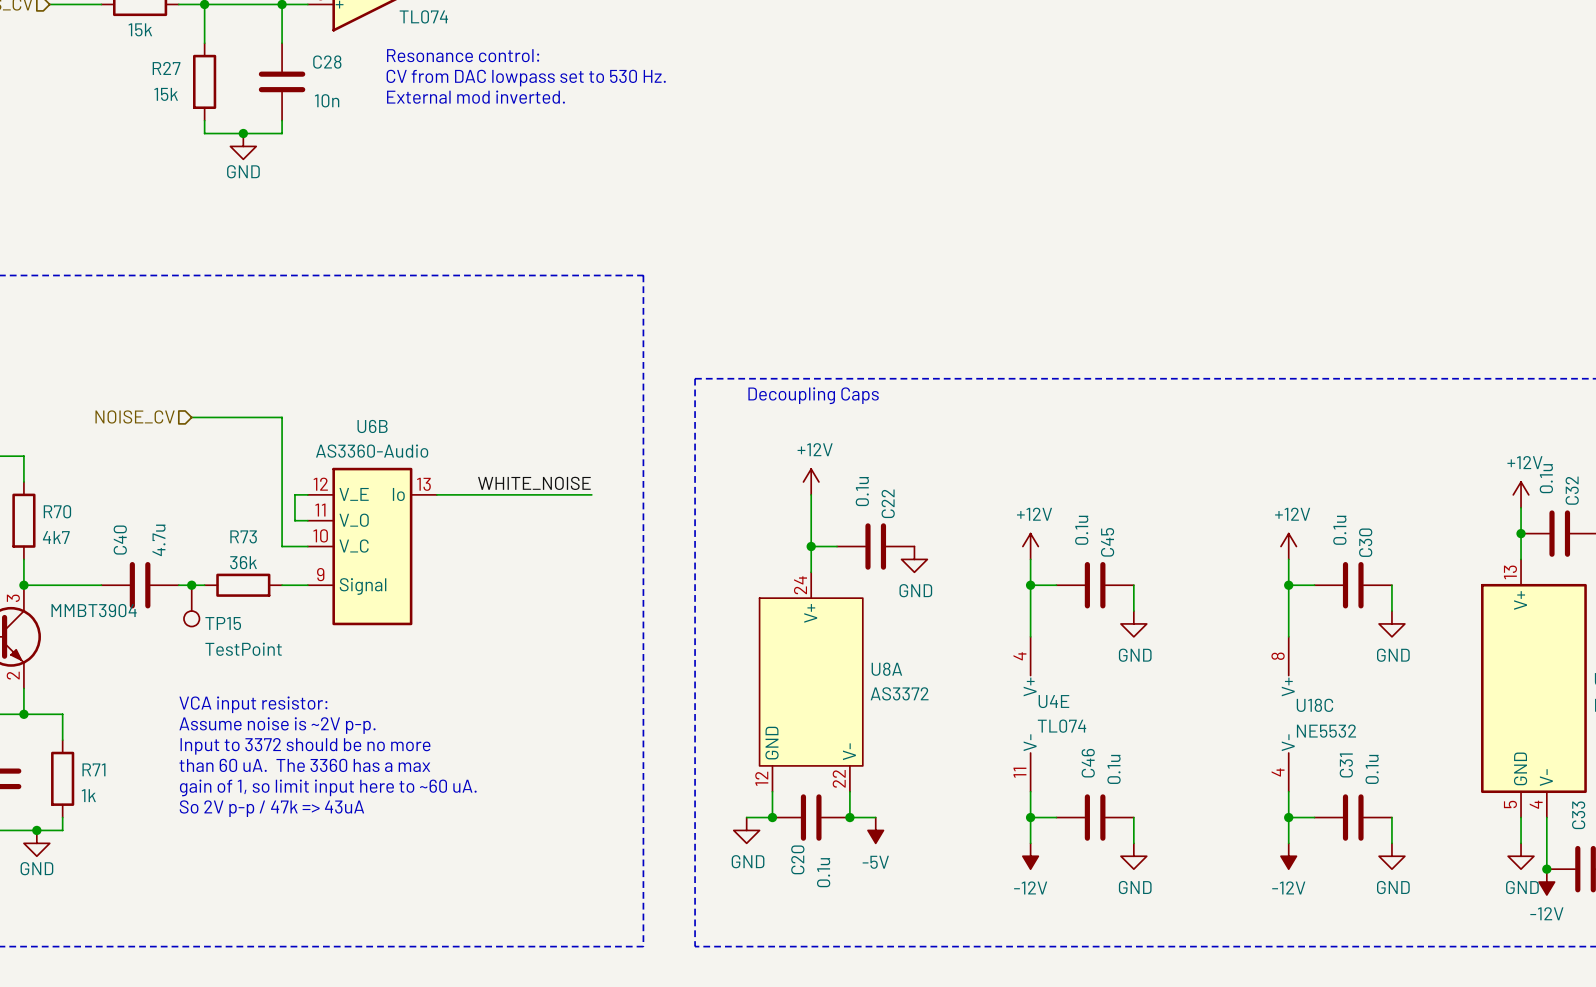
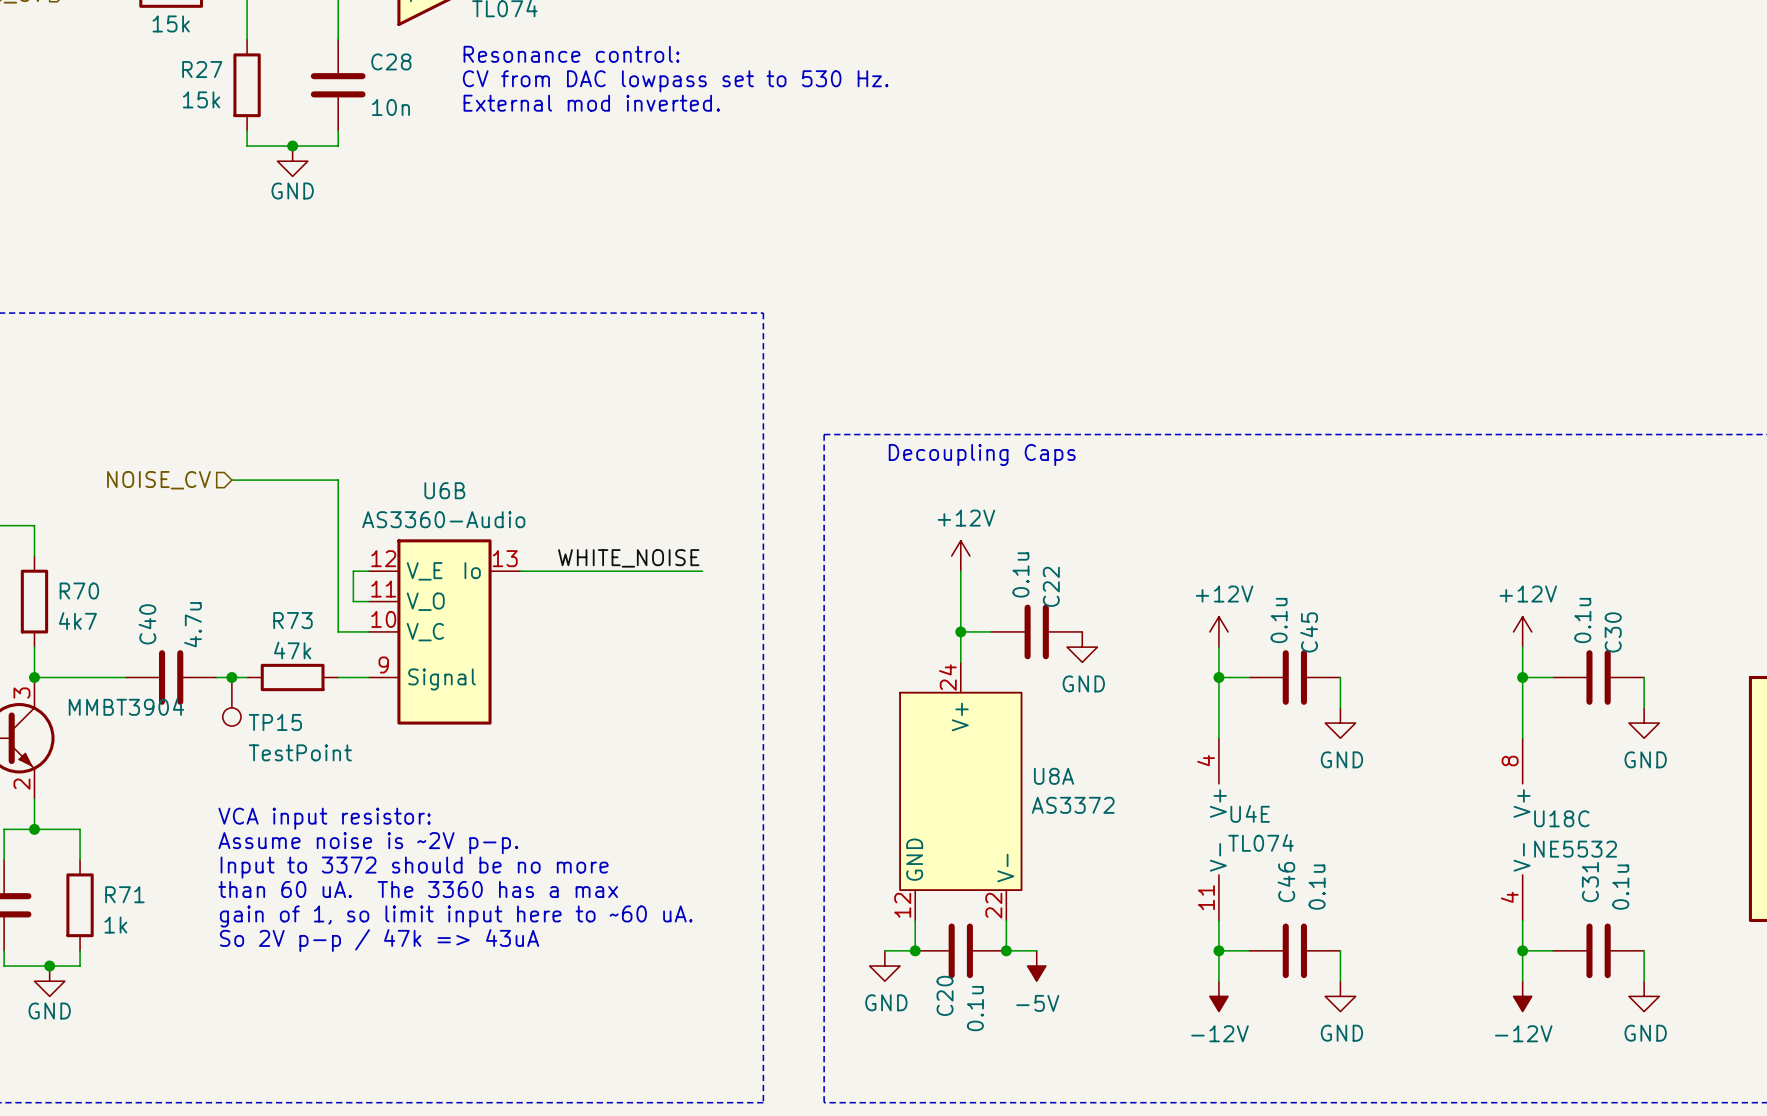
R73 value: 36k (243, 562) -> 47k (292, 650)

